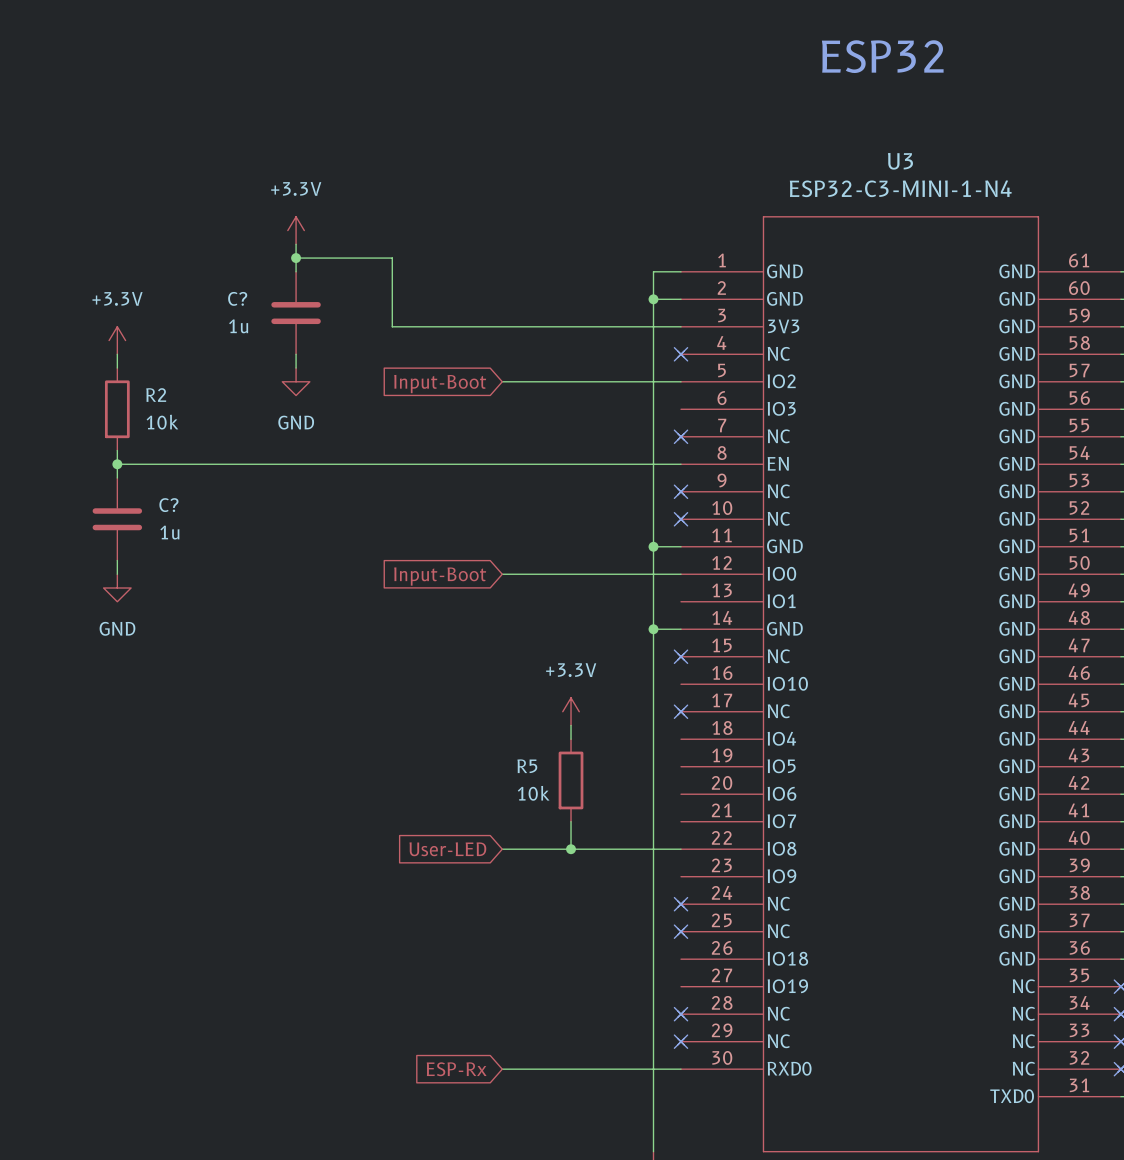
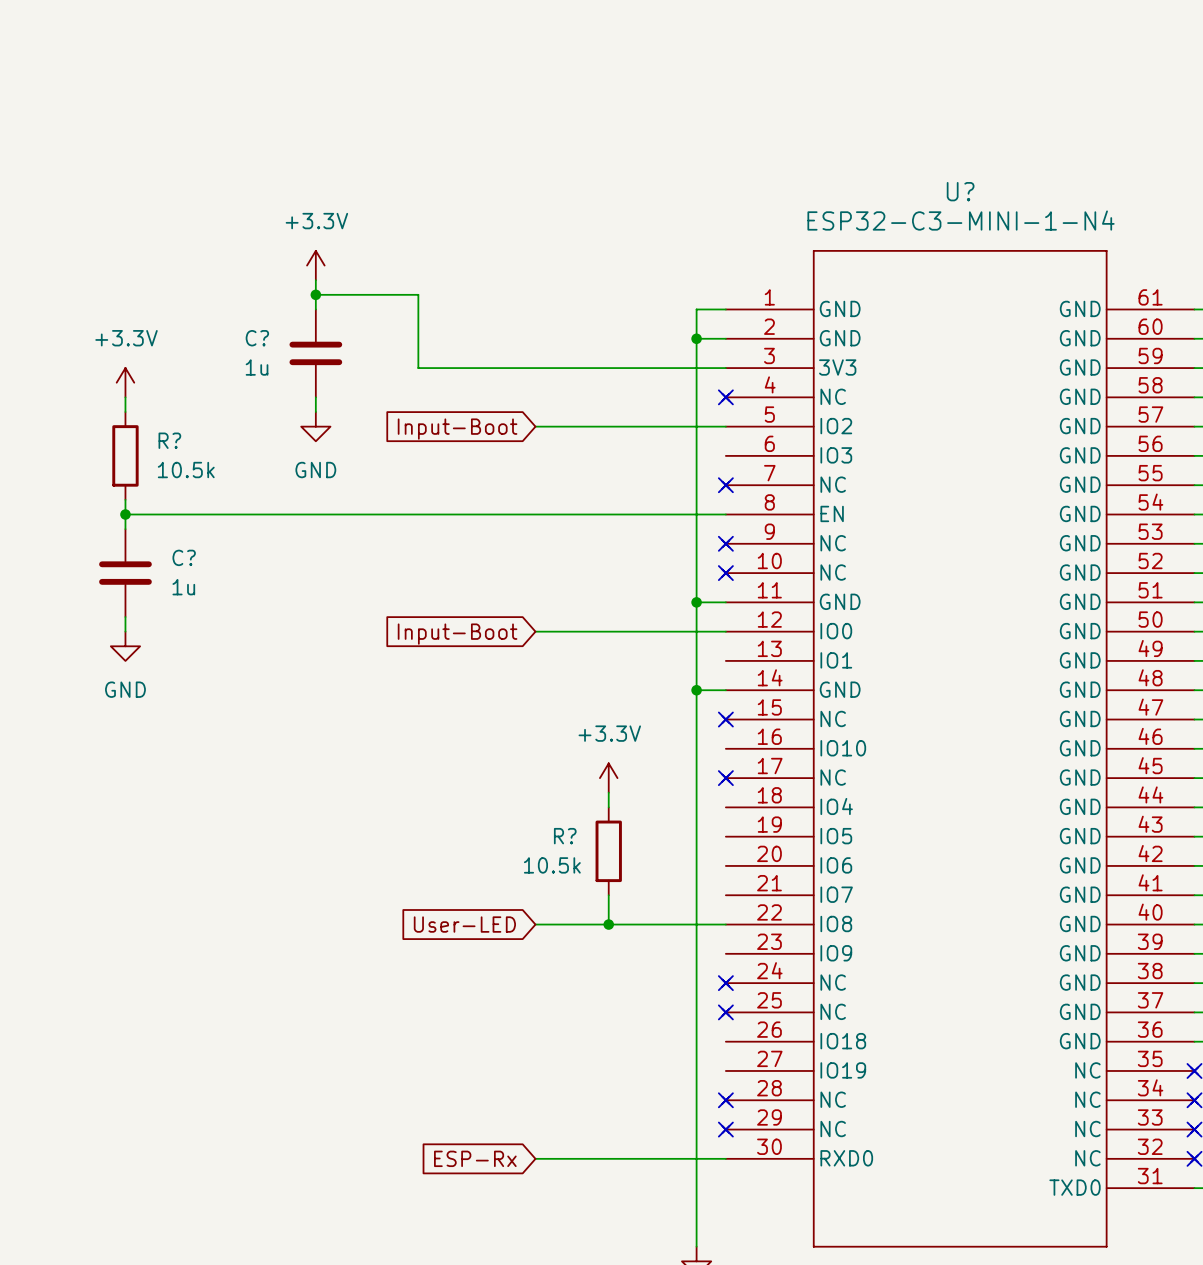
text: ESP32 (882, 56) -> none
U3 name: U3 (900, 161) -> U? (960, 191)
R2 name: R2 (156, 395) -> R? (169, 440)
R2 value: 10k (162, 422) -> 10.5k (186, 470)
R5 name: R5 (527, 766) -> R? (565, 836)
R5 value: 10k (533, 793) -> 10.5k (552, 865)

